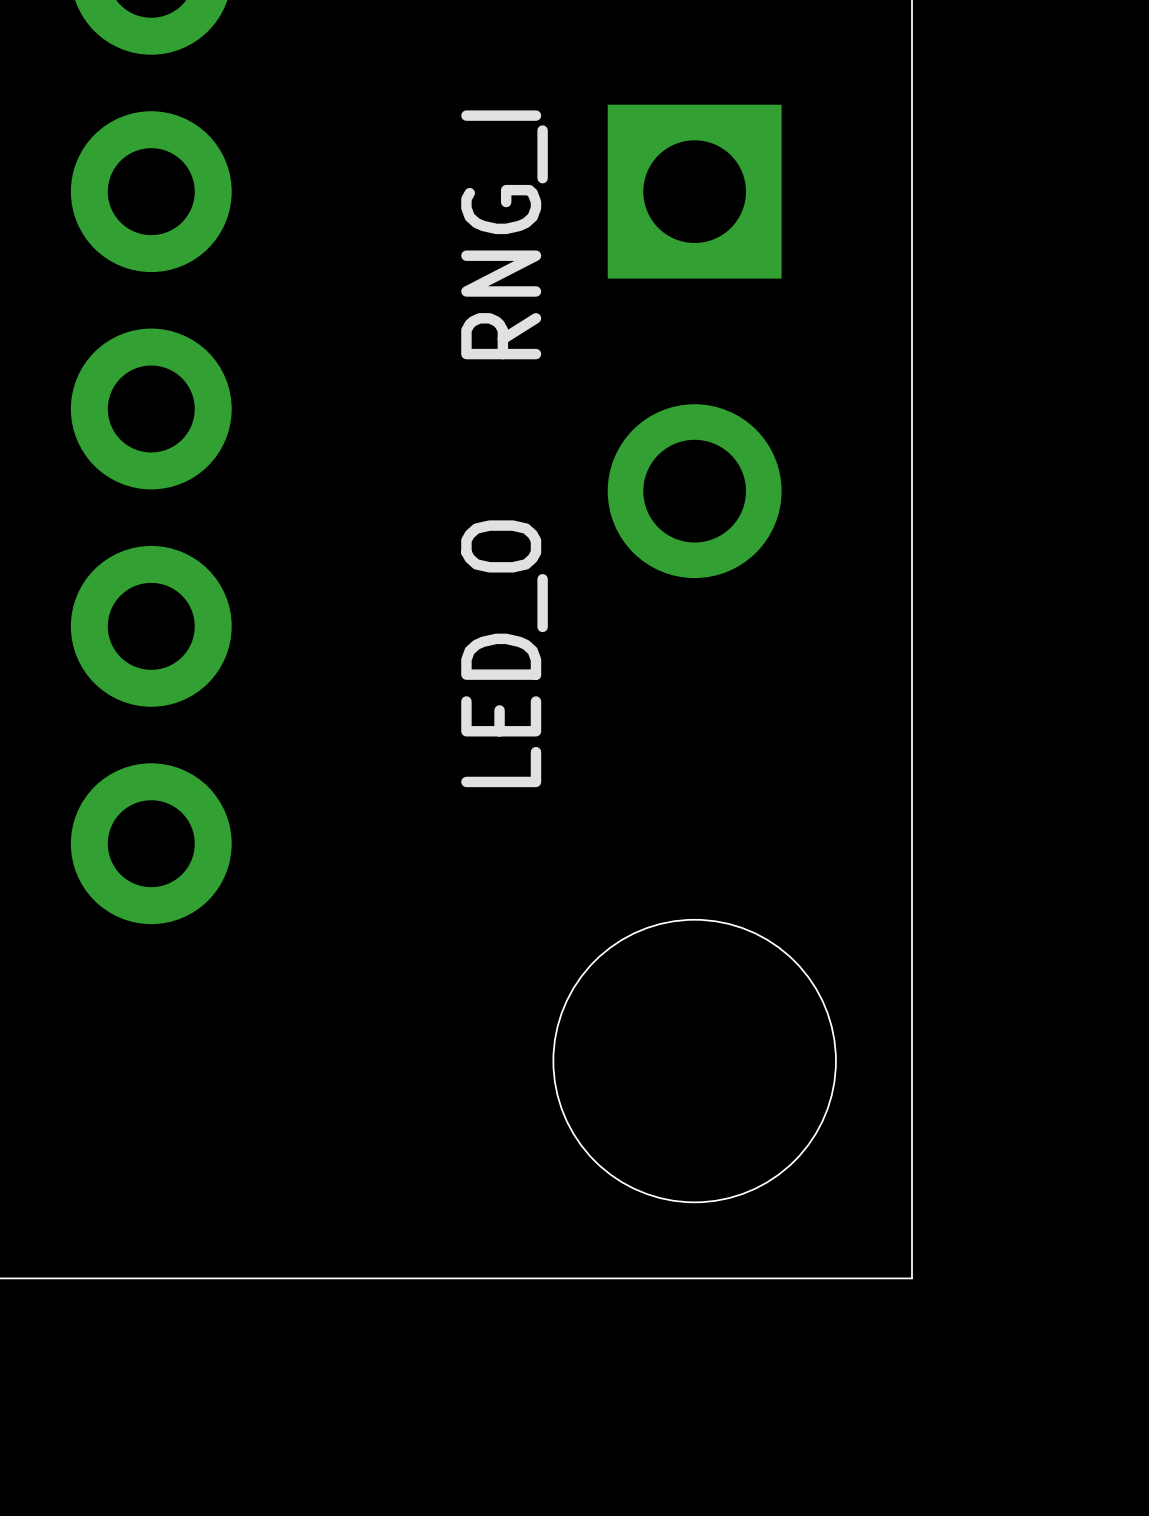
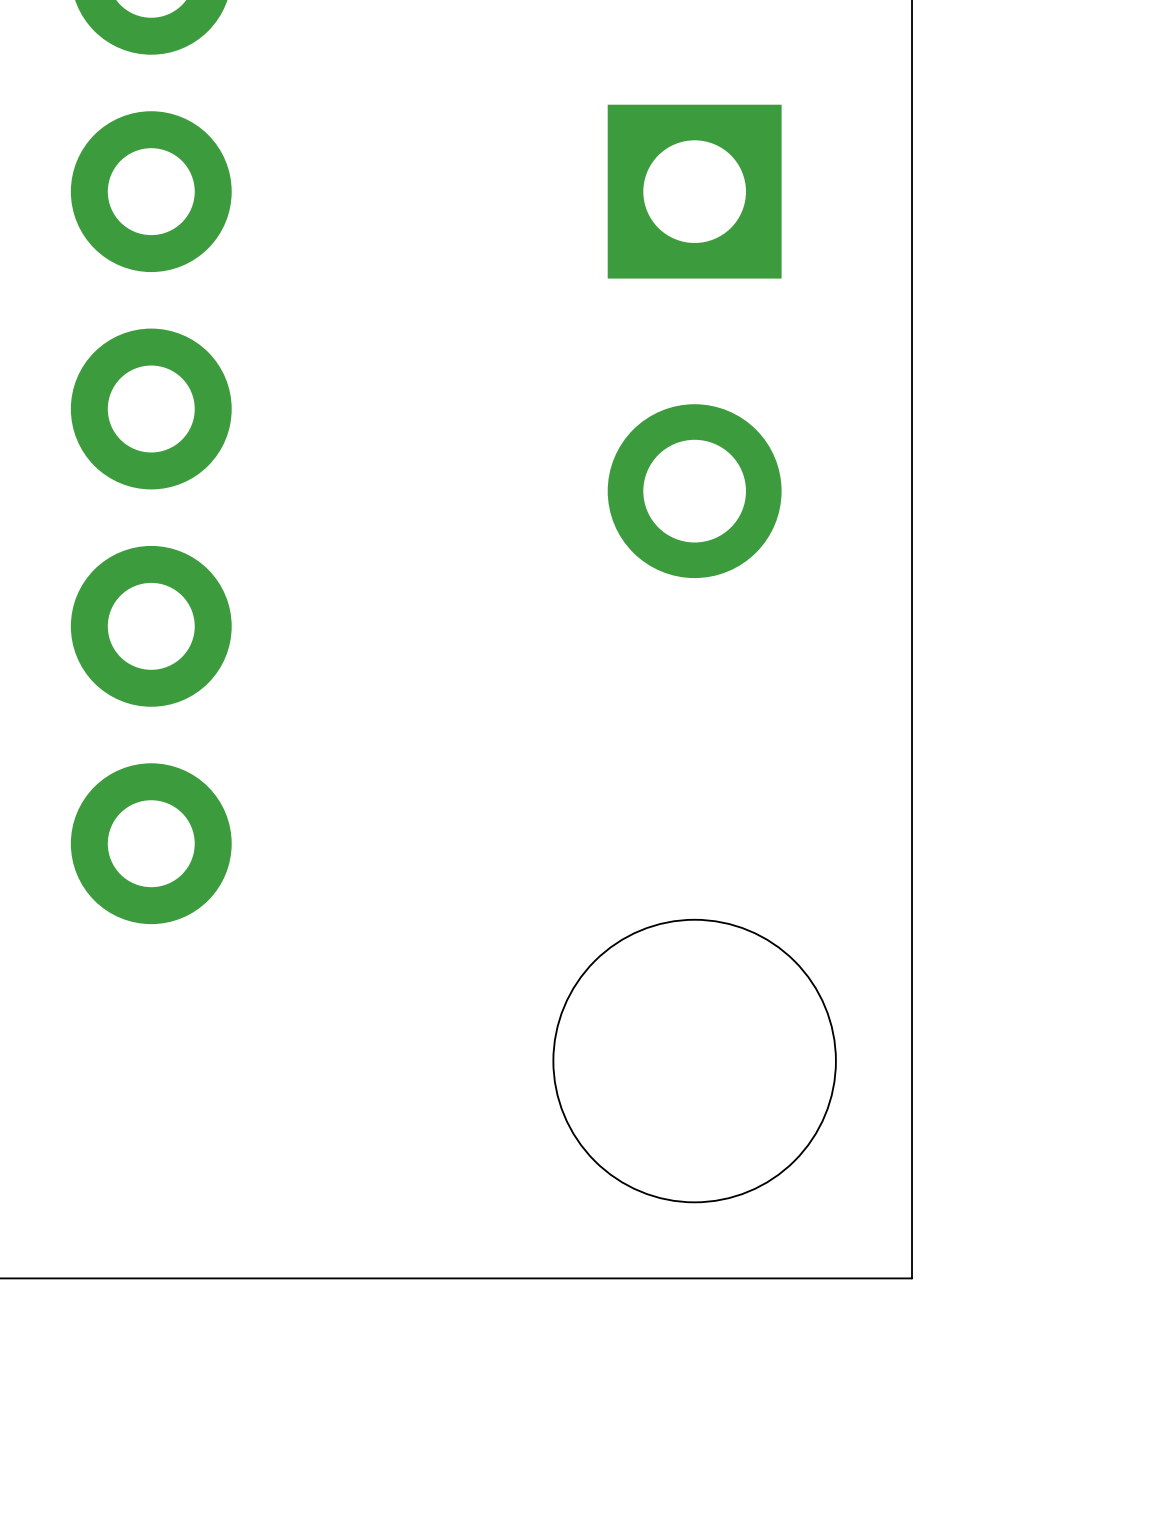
text: RNG_I (504, 234) -> none
text: LED_O (504, 653) -> none

